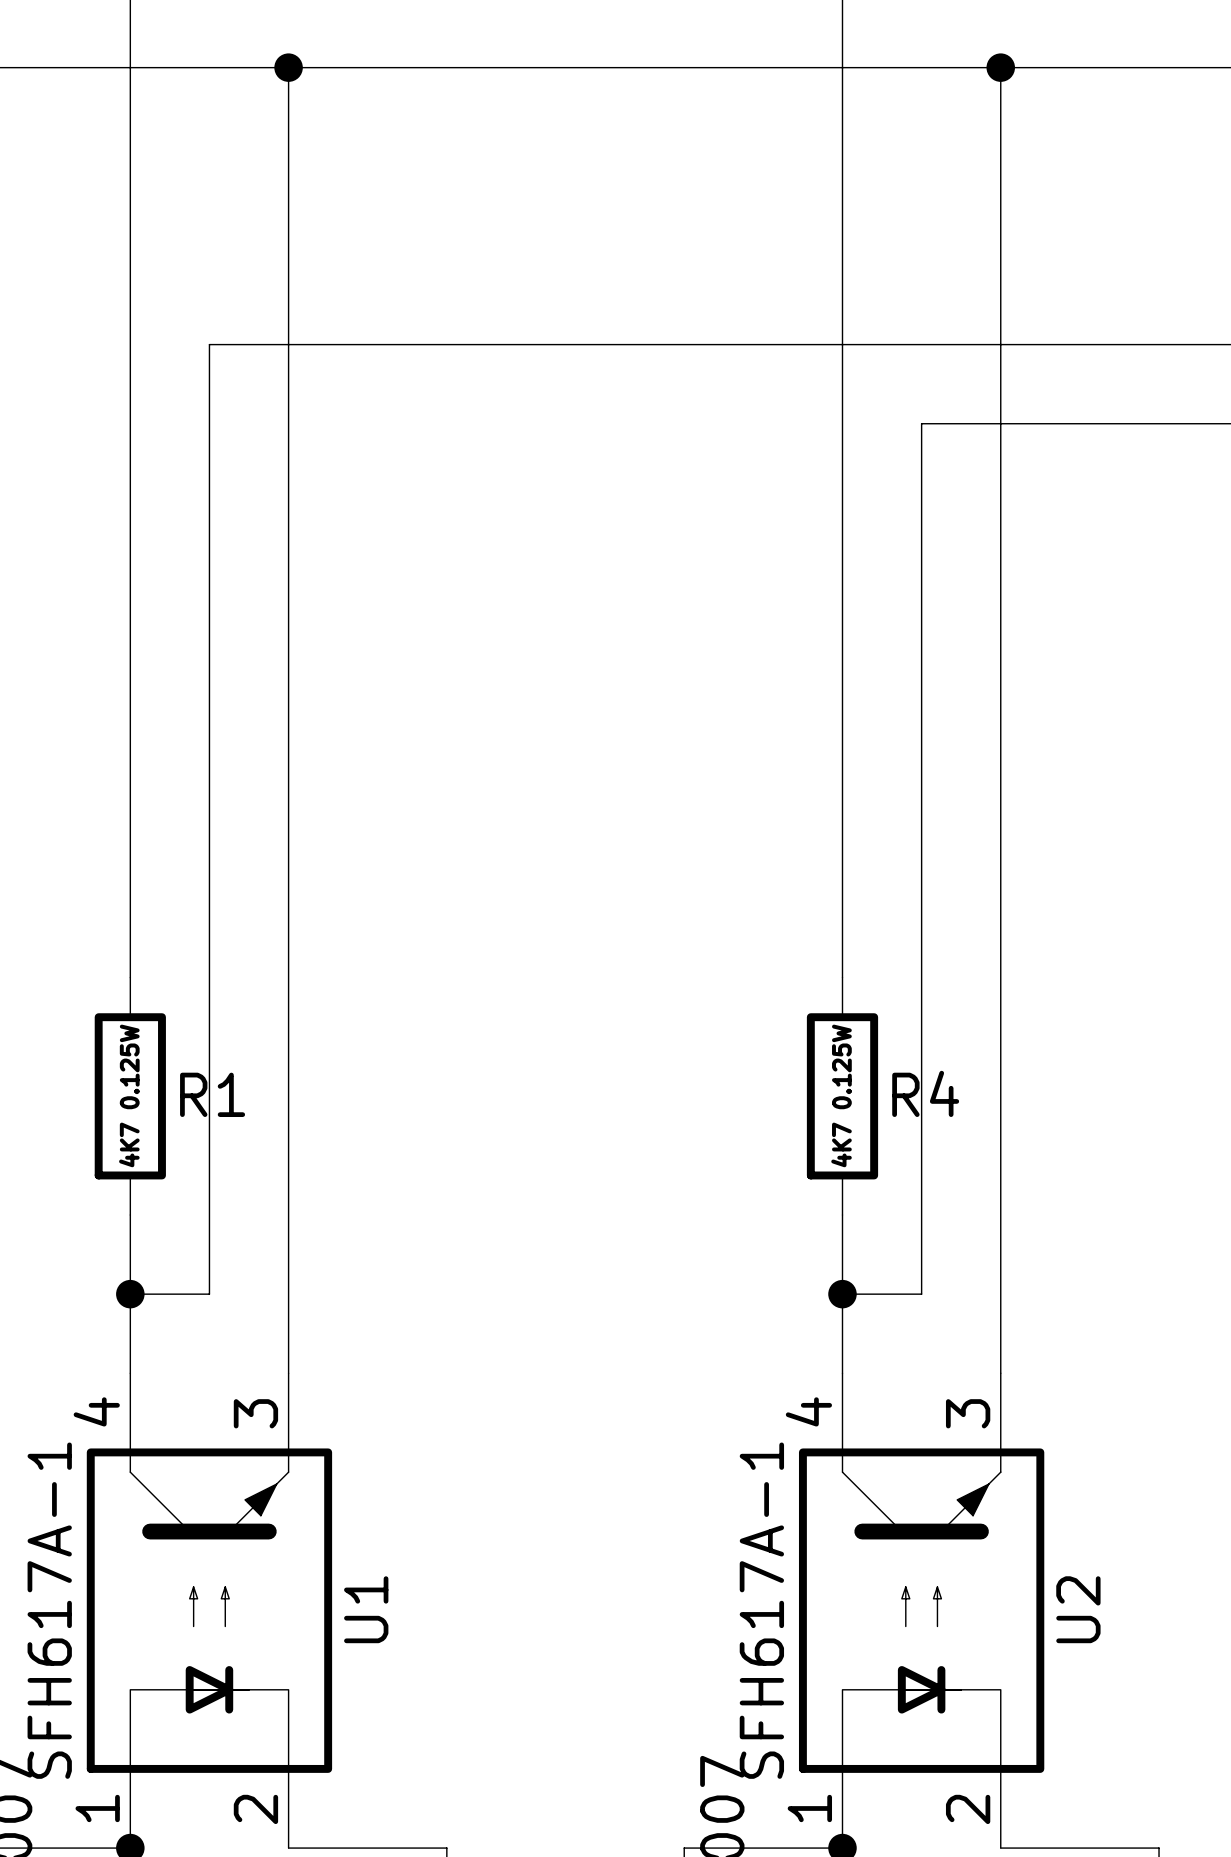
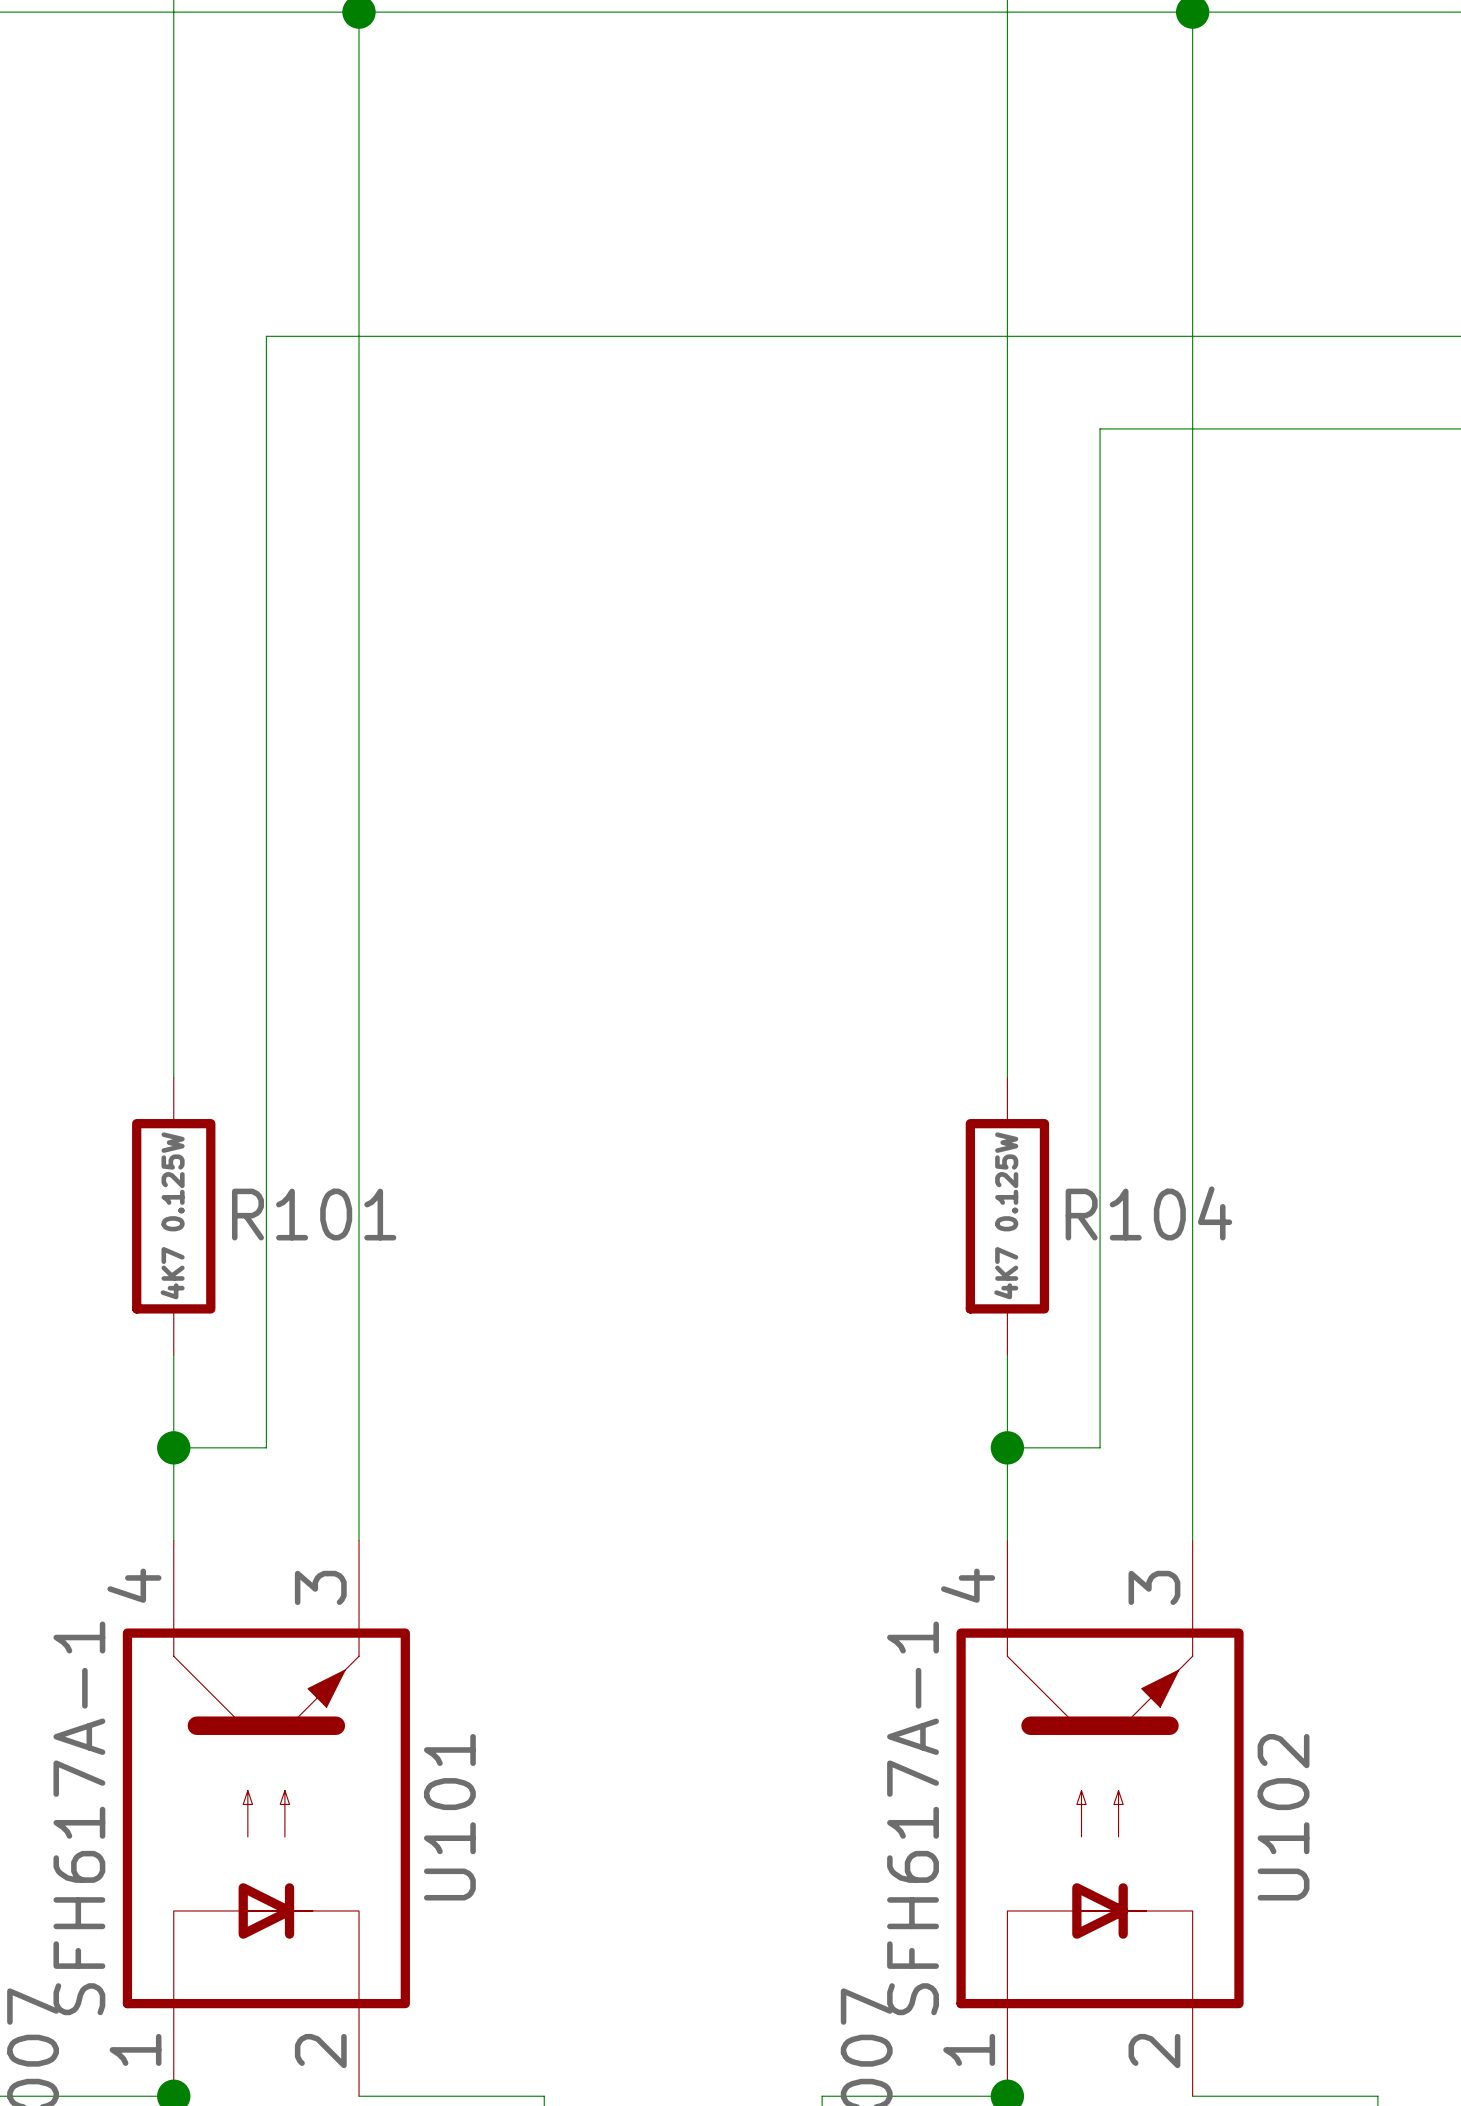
R4 name: R4 (925, 1093) -> R104 (1148, 1213)
R1 name: R1 (212, 1094) -> R101 (314, 1214)
U1 name: U1 (366, 1609) -> U101 (449, 1817)
U2 name: U2 (1078, 1609) -> U102 (1283, 1817)

